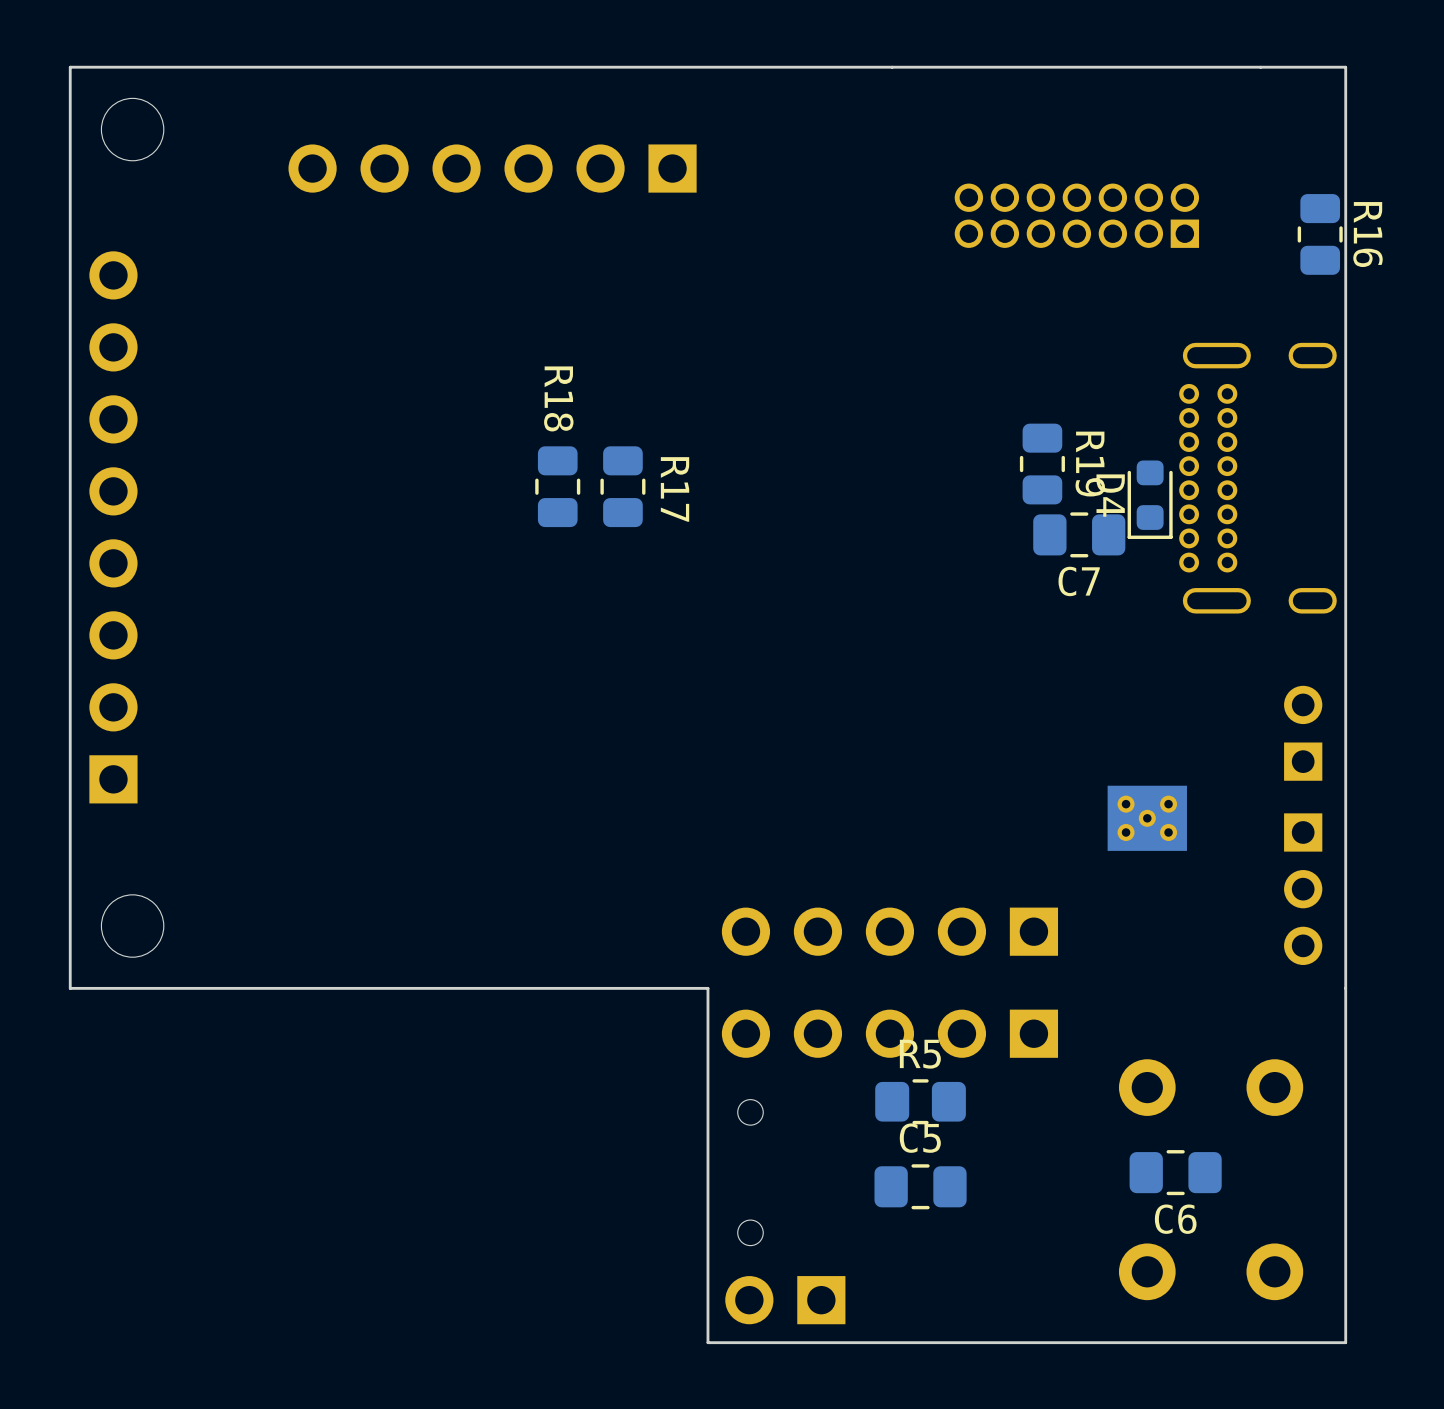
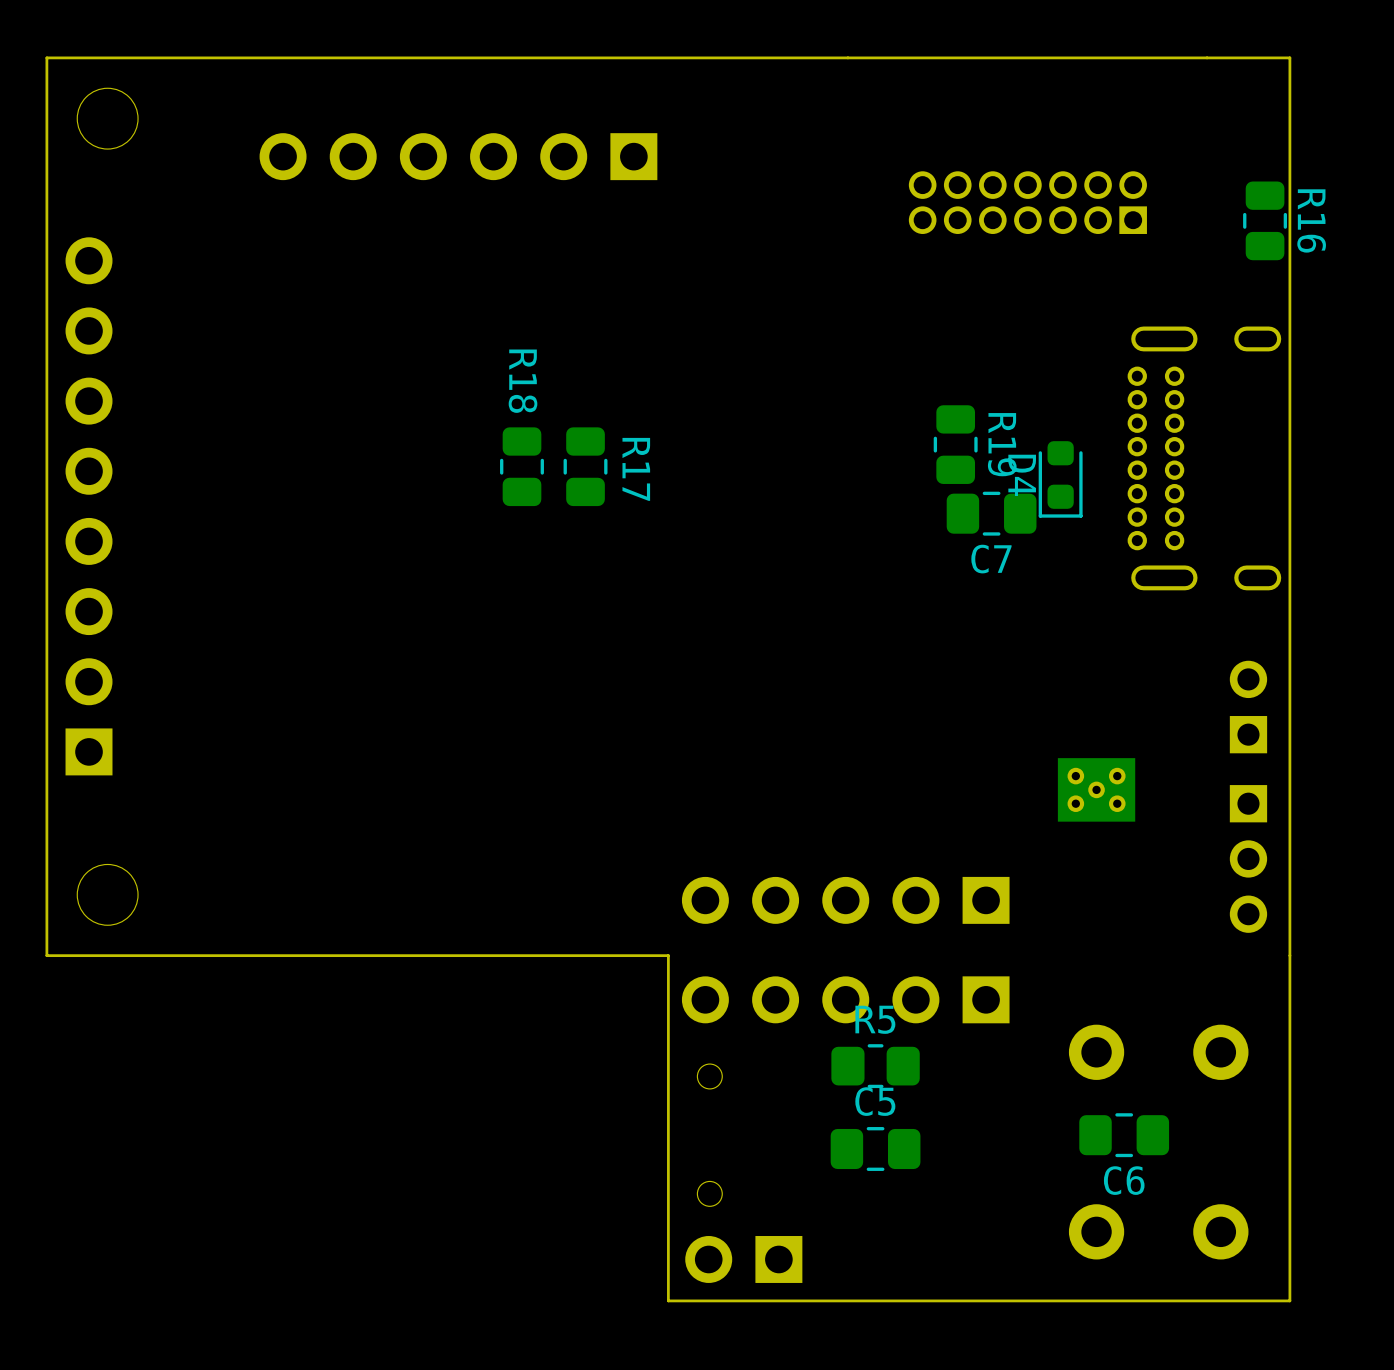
R19 position: (1042, 464) -> (955, 444)
D4 position: (1150, 499) -> (1060, 479)
C7 position: (1079, 534) -> (991, 513)

